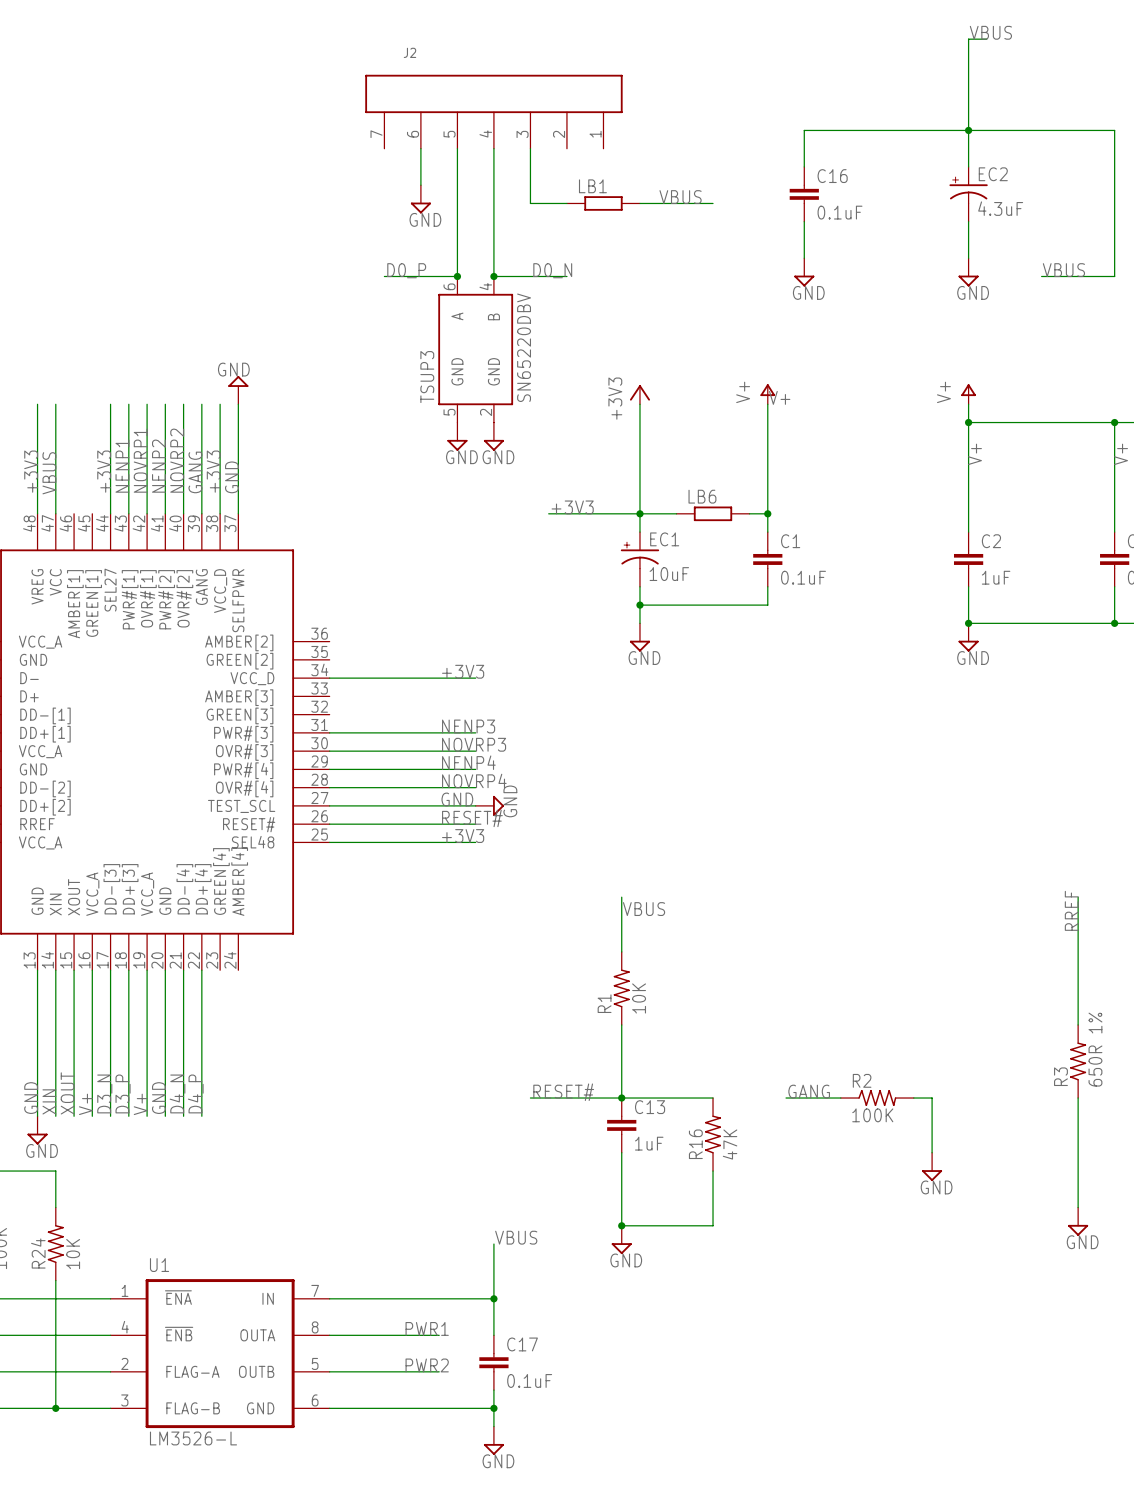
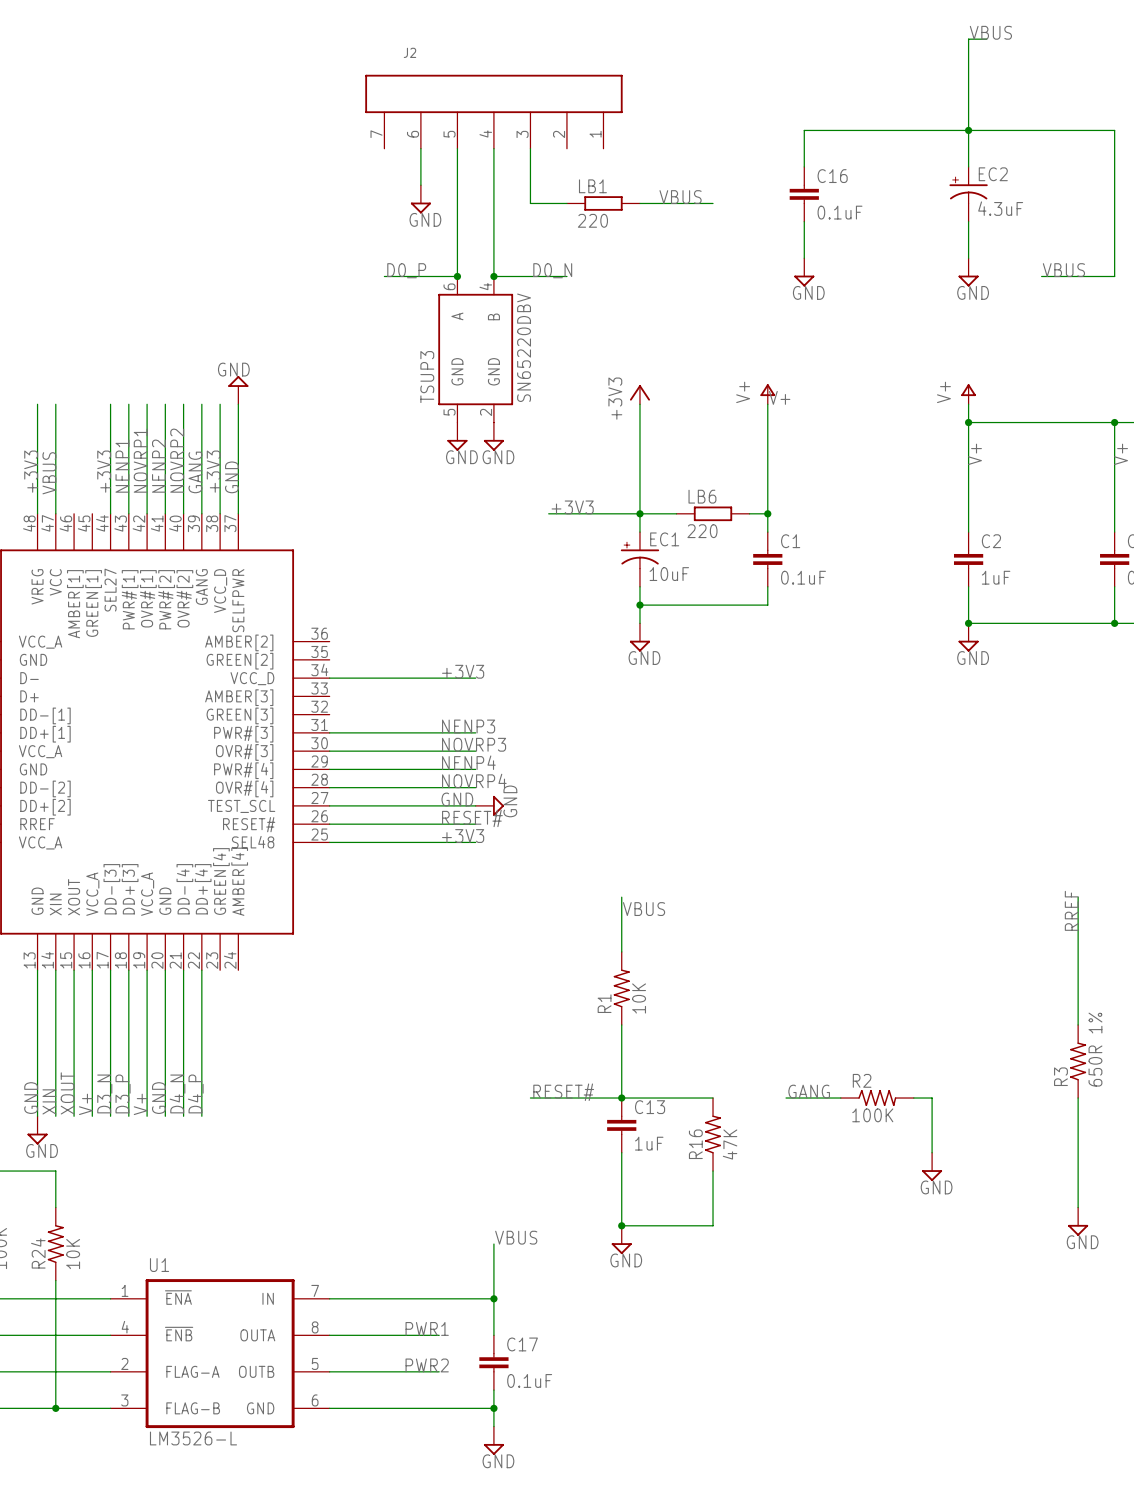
LB1 value: none -> 220 (592, 220)
LB6 value: none -> 220 (702, 531)

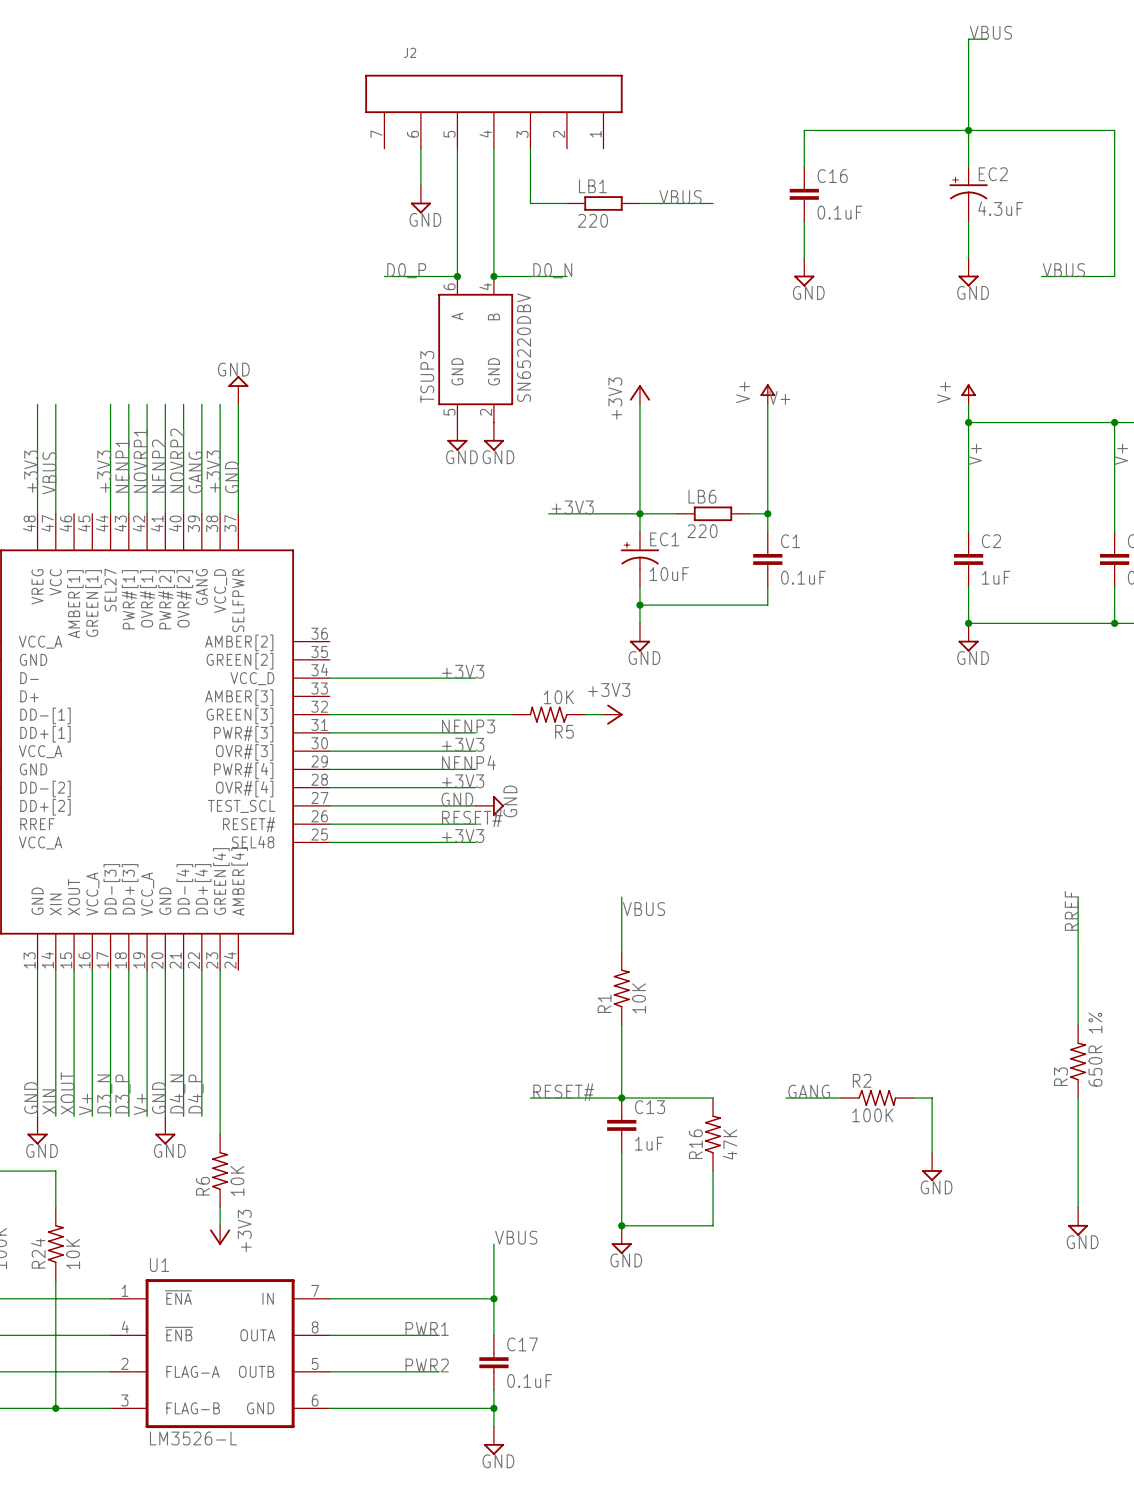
wire: none -> (329, 714) (512, 714)
R5: none -> 10K (548, 714)
wire: none -> (585, 714) (603, 714)
power symbol: none -> +3V3 (613, 714)
label: NOVRP3 (474, 744) -> +3V3 (463, 744)
label: NOVRP4 (474, 780) -> +3V3 (463, 781)
wire: none -> (220, 970) (220, 1134)
power symbol: none -> GND (165, 1130)
R6: none -> 10K (220, 1171)
wire: none -> (220, 1207) (220, 1225)
power symbol: none -> +3V3 (220, 1235)

